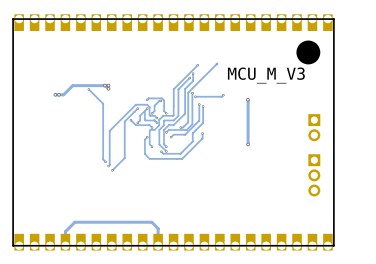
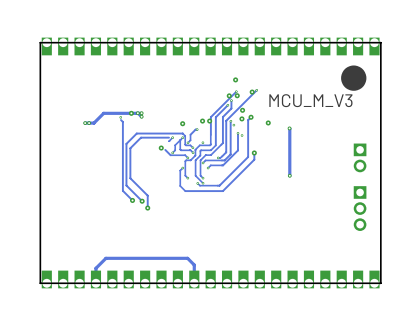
via: none -> (235, 79)
via: none -> (252, 92)
via: none -> (229, 95)
via: none -> (237, 95)
via: none -> (242, 110)
via: none -> (131, 113)
track: (88, 89) (103, 103) (103, 159) (105, 161) -> none
via: none -> (251, 117)
via: none -> (241, 118)
track: none -> (121, 120) (122, 121) (122, 190) (132, 200)
via: none -> (202, 121)
via: none -> (209, 121)
via: none -> (268, 122)
via: none -> (182, 123)
track: (223, 95) (195, 96) -> none
via: (223, 95) -> none
track: (147, 99) (161, 98) (164, 100) (164, 111) (166, 113) -> none
via: (147, 99) -> none
track: (135, 104) (109, 130) (108, 166) -> (170, 133) (136, 133) (126, 143) (126, 185) (142, 201)
track: (203, 106) (203, 122) (192, 133) (192, 141) (180, 153) -> (251, 117) (248, 120) (248, 157) (218, 185)
track: none -> (168, 137) (141, 137) (130, 148) (130, 178) (147, 195) (147, 208)
track: (134, 111) (124, 121) (124, 158) (112, 170) -> none
via: none -> (161, 148)
via: (130, 120) -> none
via: none -> (254, 152)
track: (202, 133) (202, 138) (182, 158) -> (254, 152) (254, 159) (222, 191) (219, 191)
via: (202, 133) -> none
via: (105, 161) -> none
via: (108, 166) -> none
via: none -> (132, 200)
via: none -> (142, 201)
via: (112, 170) -> none
via: none -> (147, 208)

